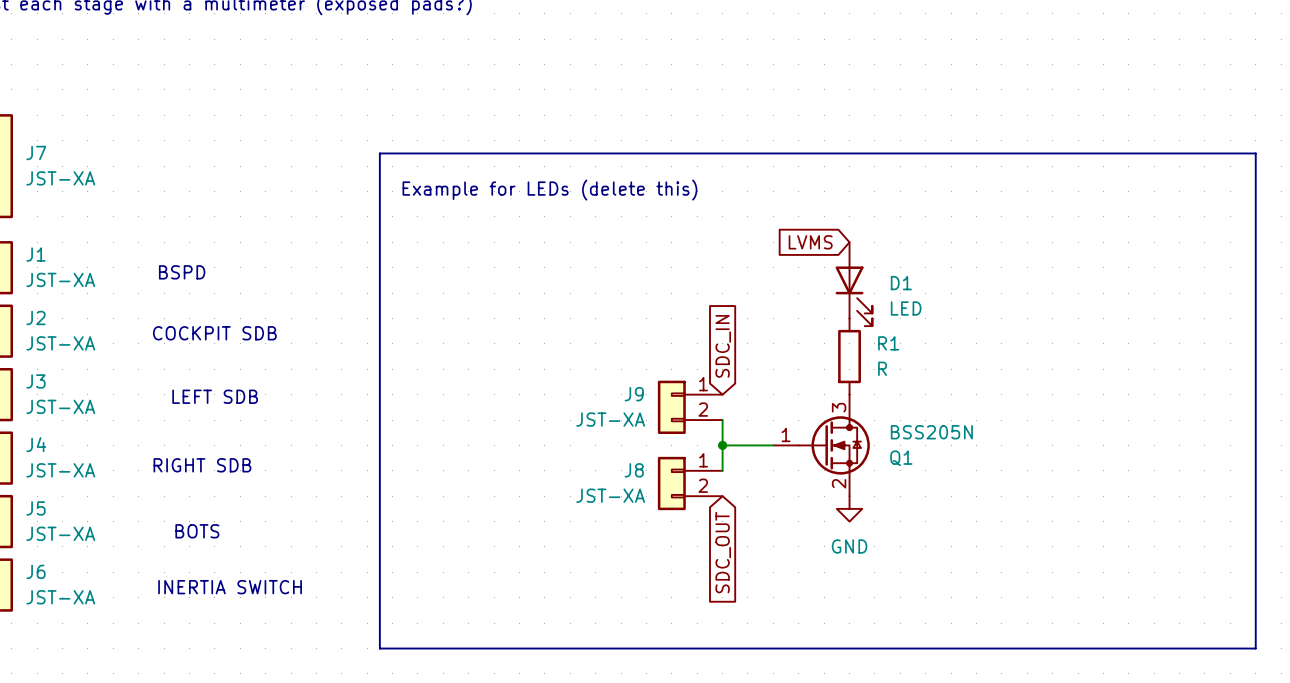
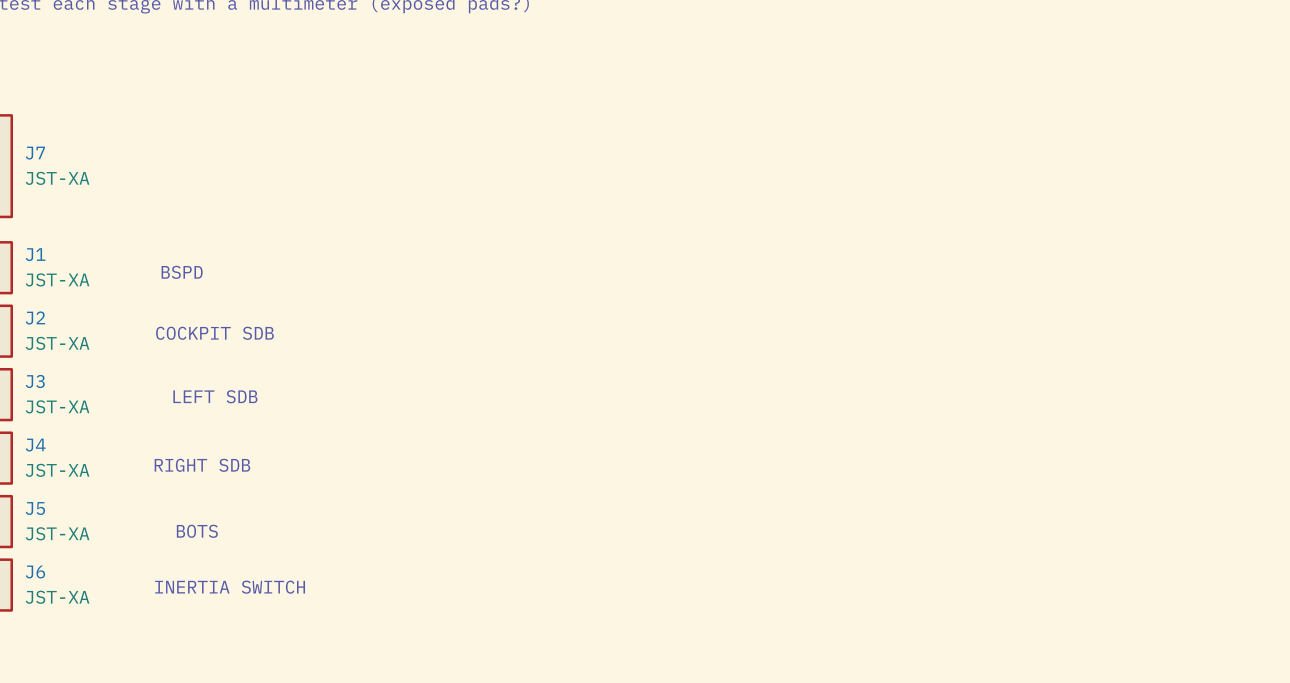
line: (379, 153) (1255, 153) (1255, 648) (379, 648) (379, 153) -> none
text: Example for LEDs (delete this) (549, 190) -> none
global label: LVMS (810, 242) -> none
D1: LED (853, 284) -> none
global label: SDC_IN (723, 346) -> none
R1: R (849, 356) -> none
J9: JST-XA (690, 407) -> none
wire: (722, 420) (722, 470) -> none
wire: (722, 445) (773, 445) -> none
junction: (722, 445) -> none
Q1: BSS205N (821, 445) -> none
J8: JST-XA (690, 483) -> none
power symbol: GND (849, 508) -> none
global label: SDC_OUT (723, 552) -> none

